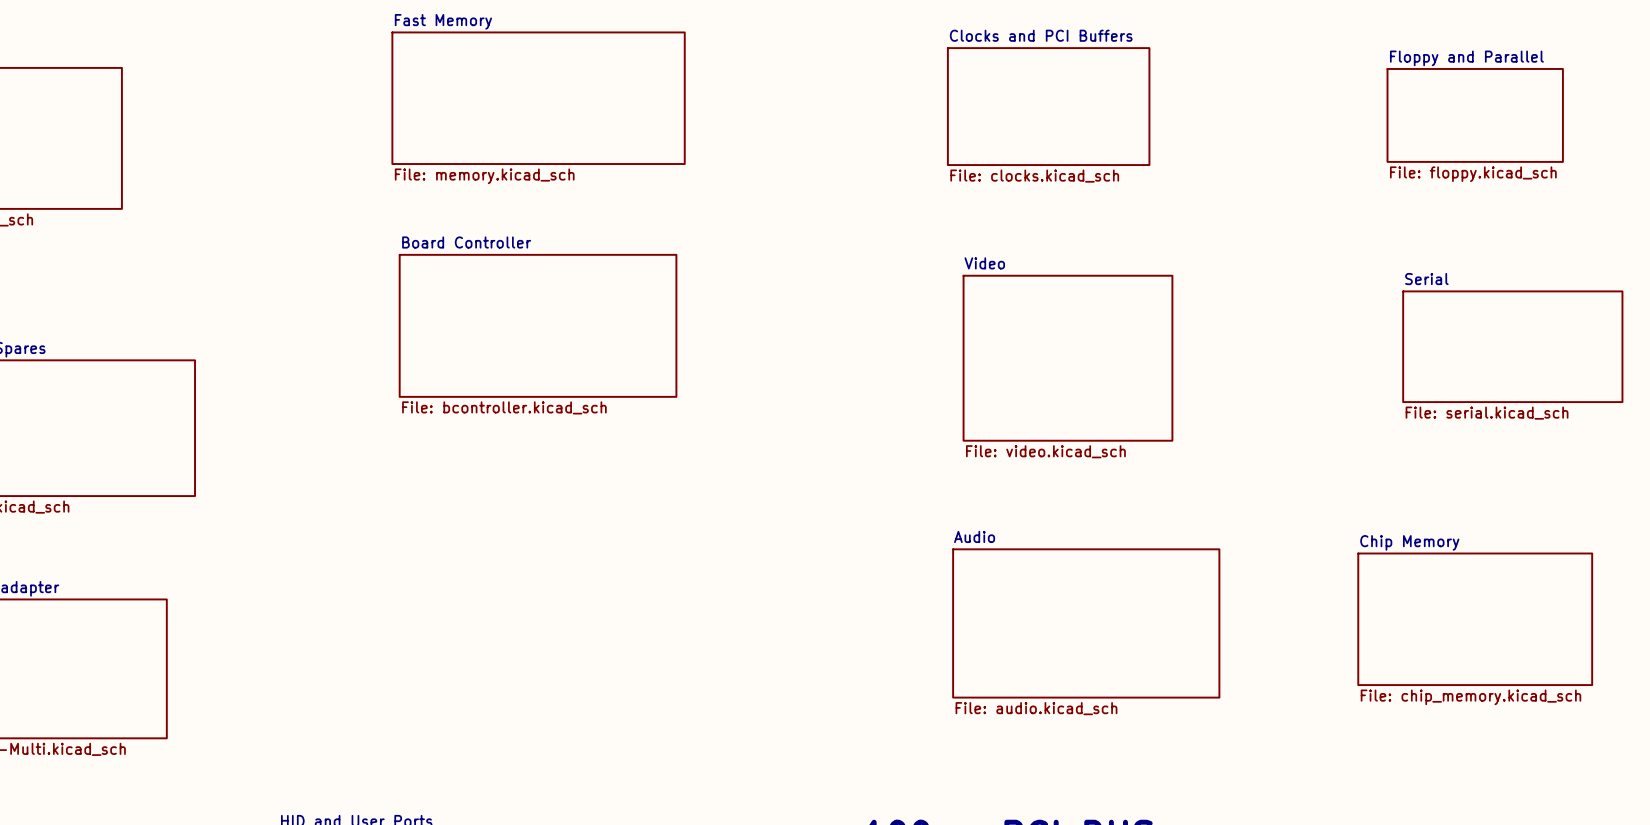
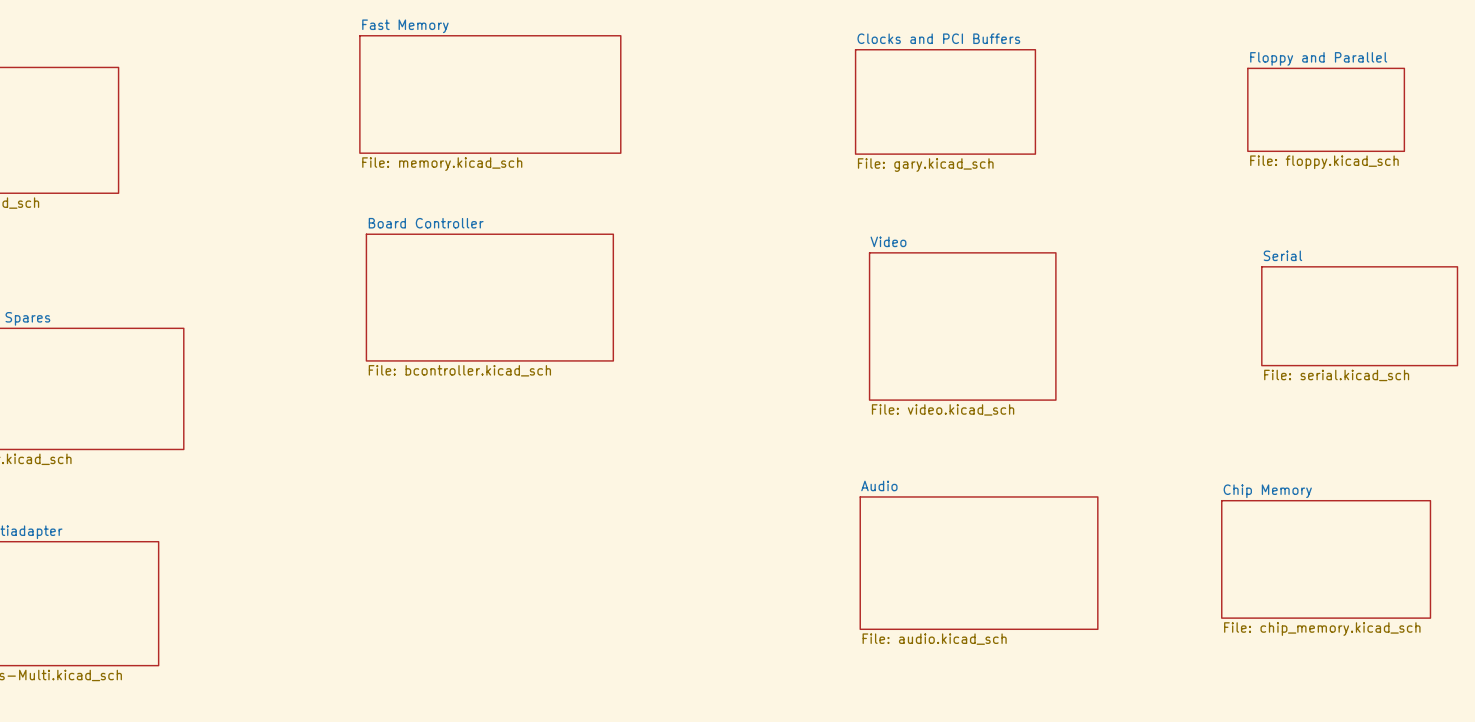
sheet Clocks and PCI Buffers value: File: clocks.kicad_sch (1034, 176) -> File: gary.kicad_sch (925, 165)

